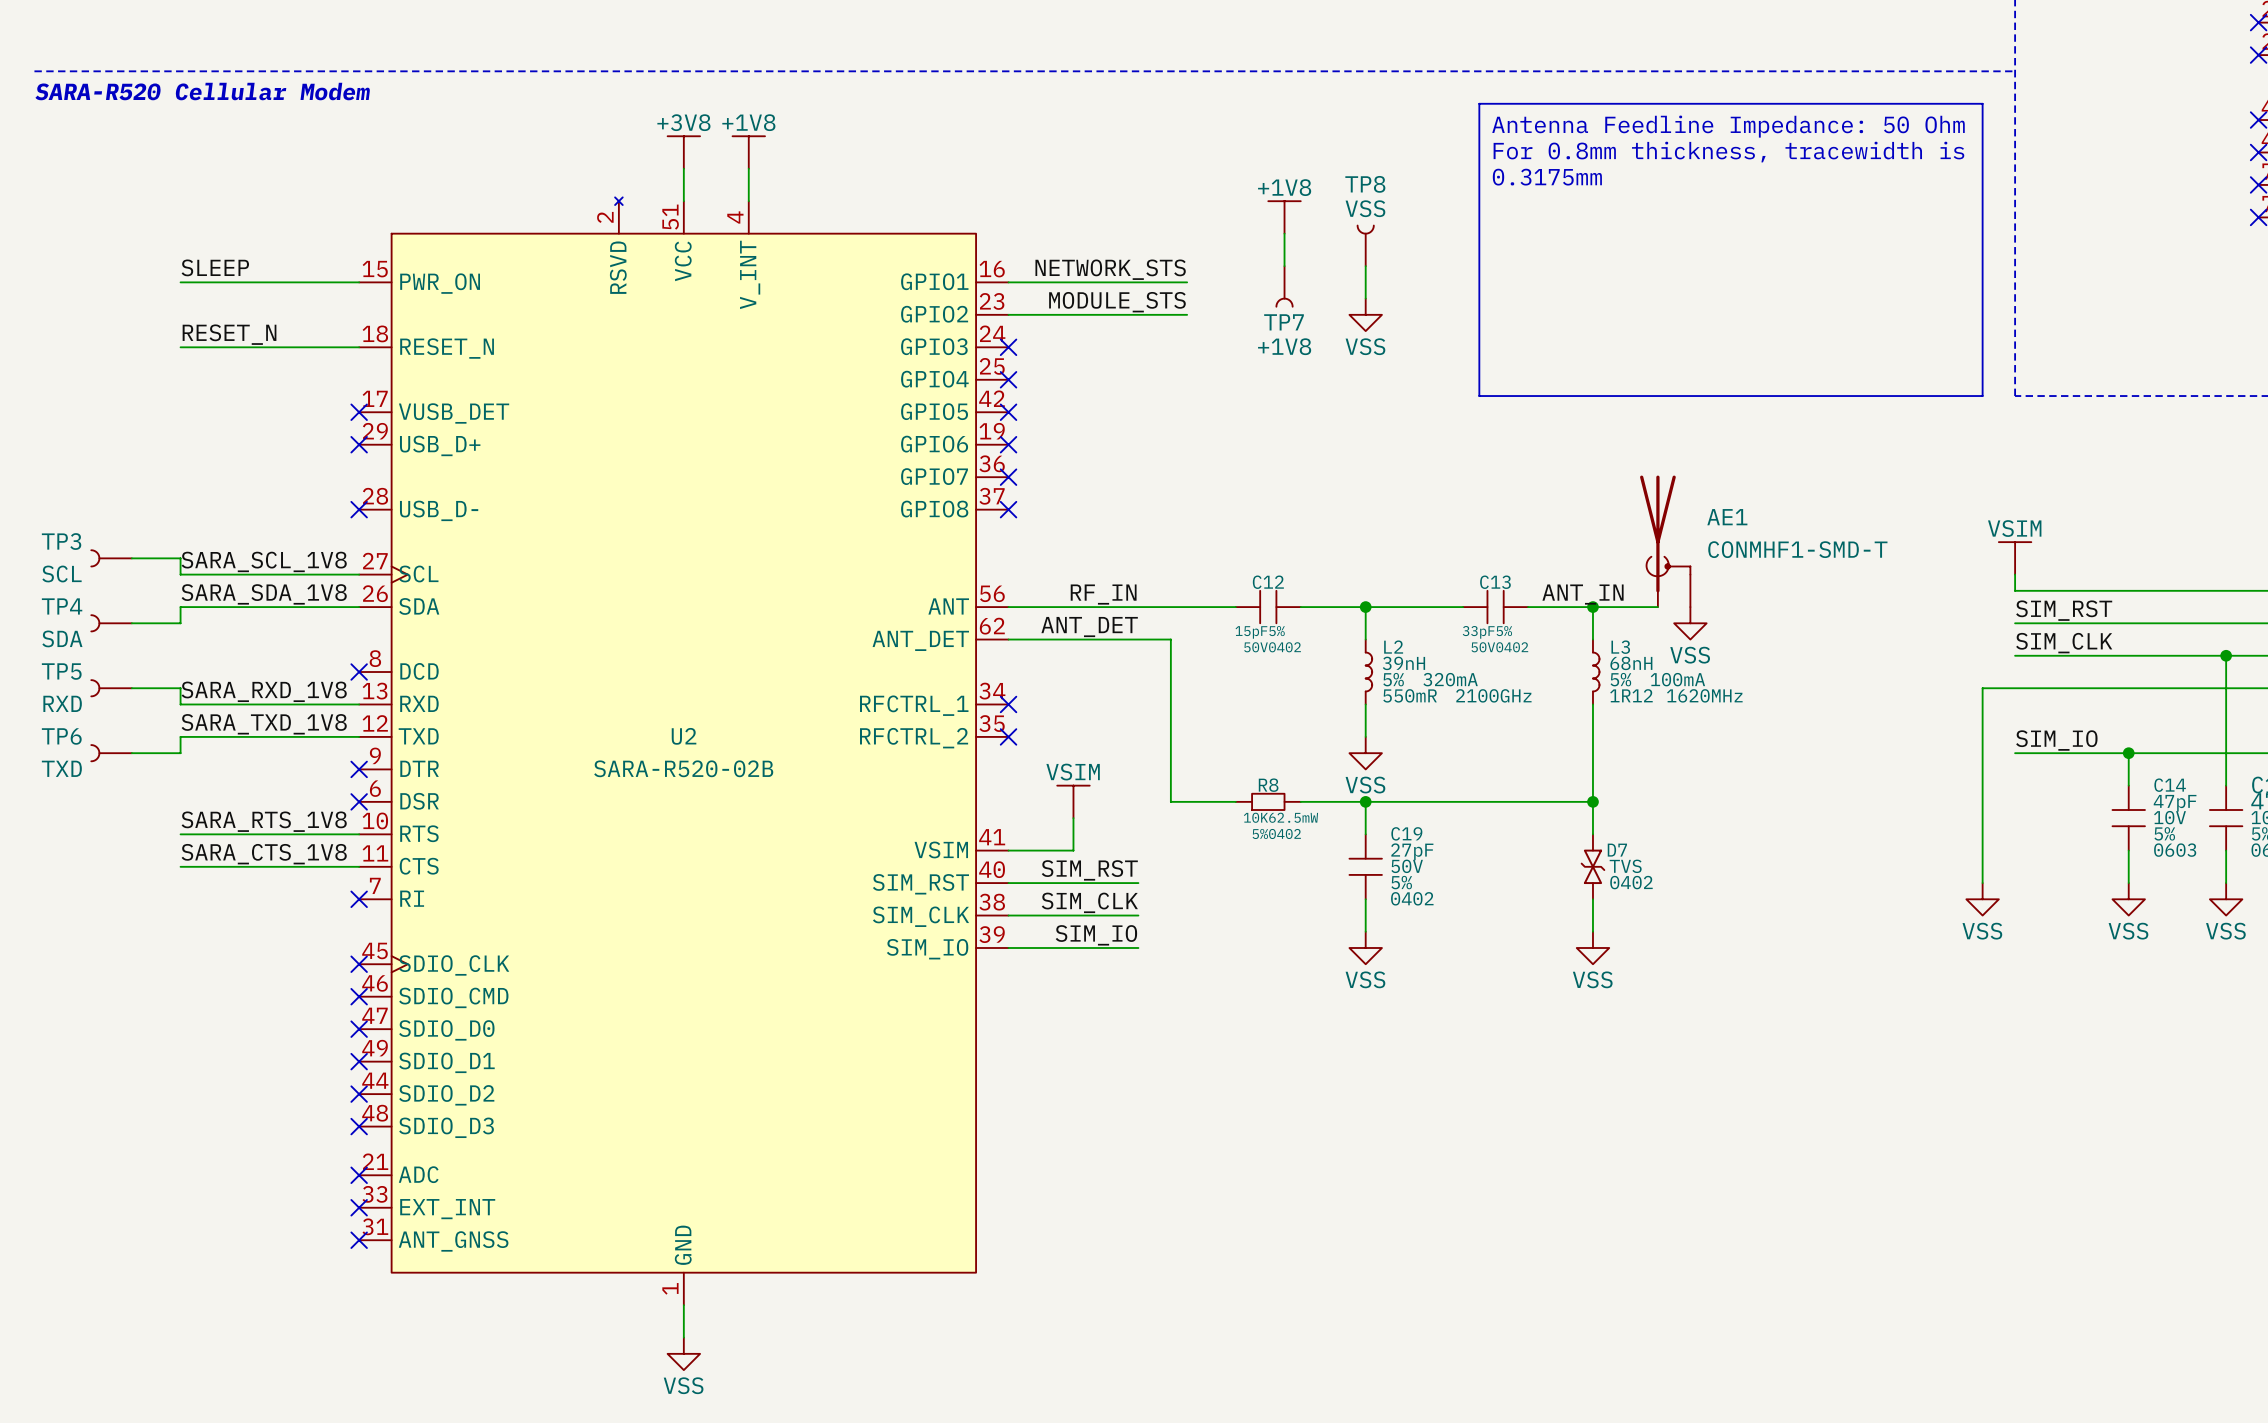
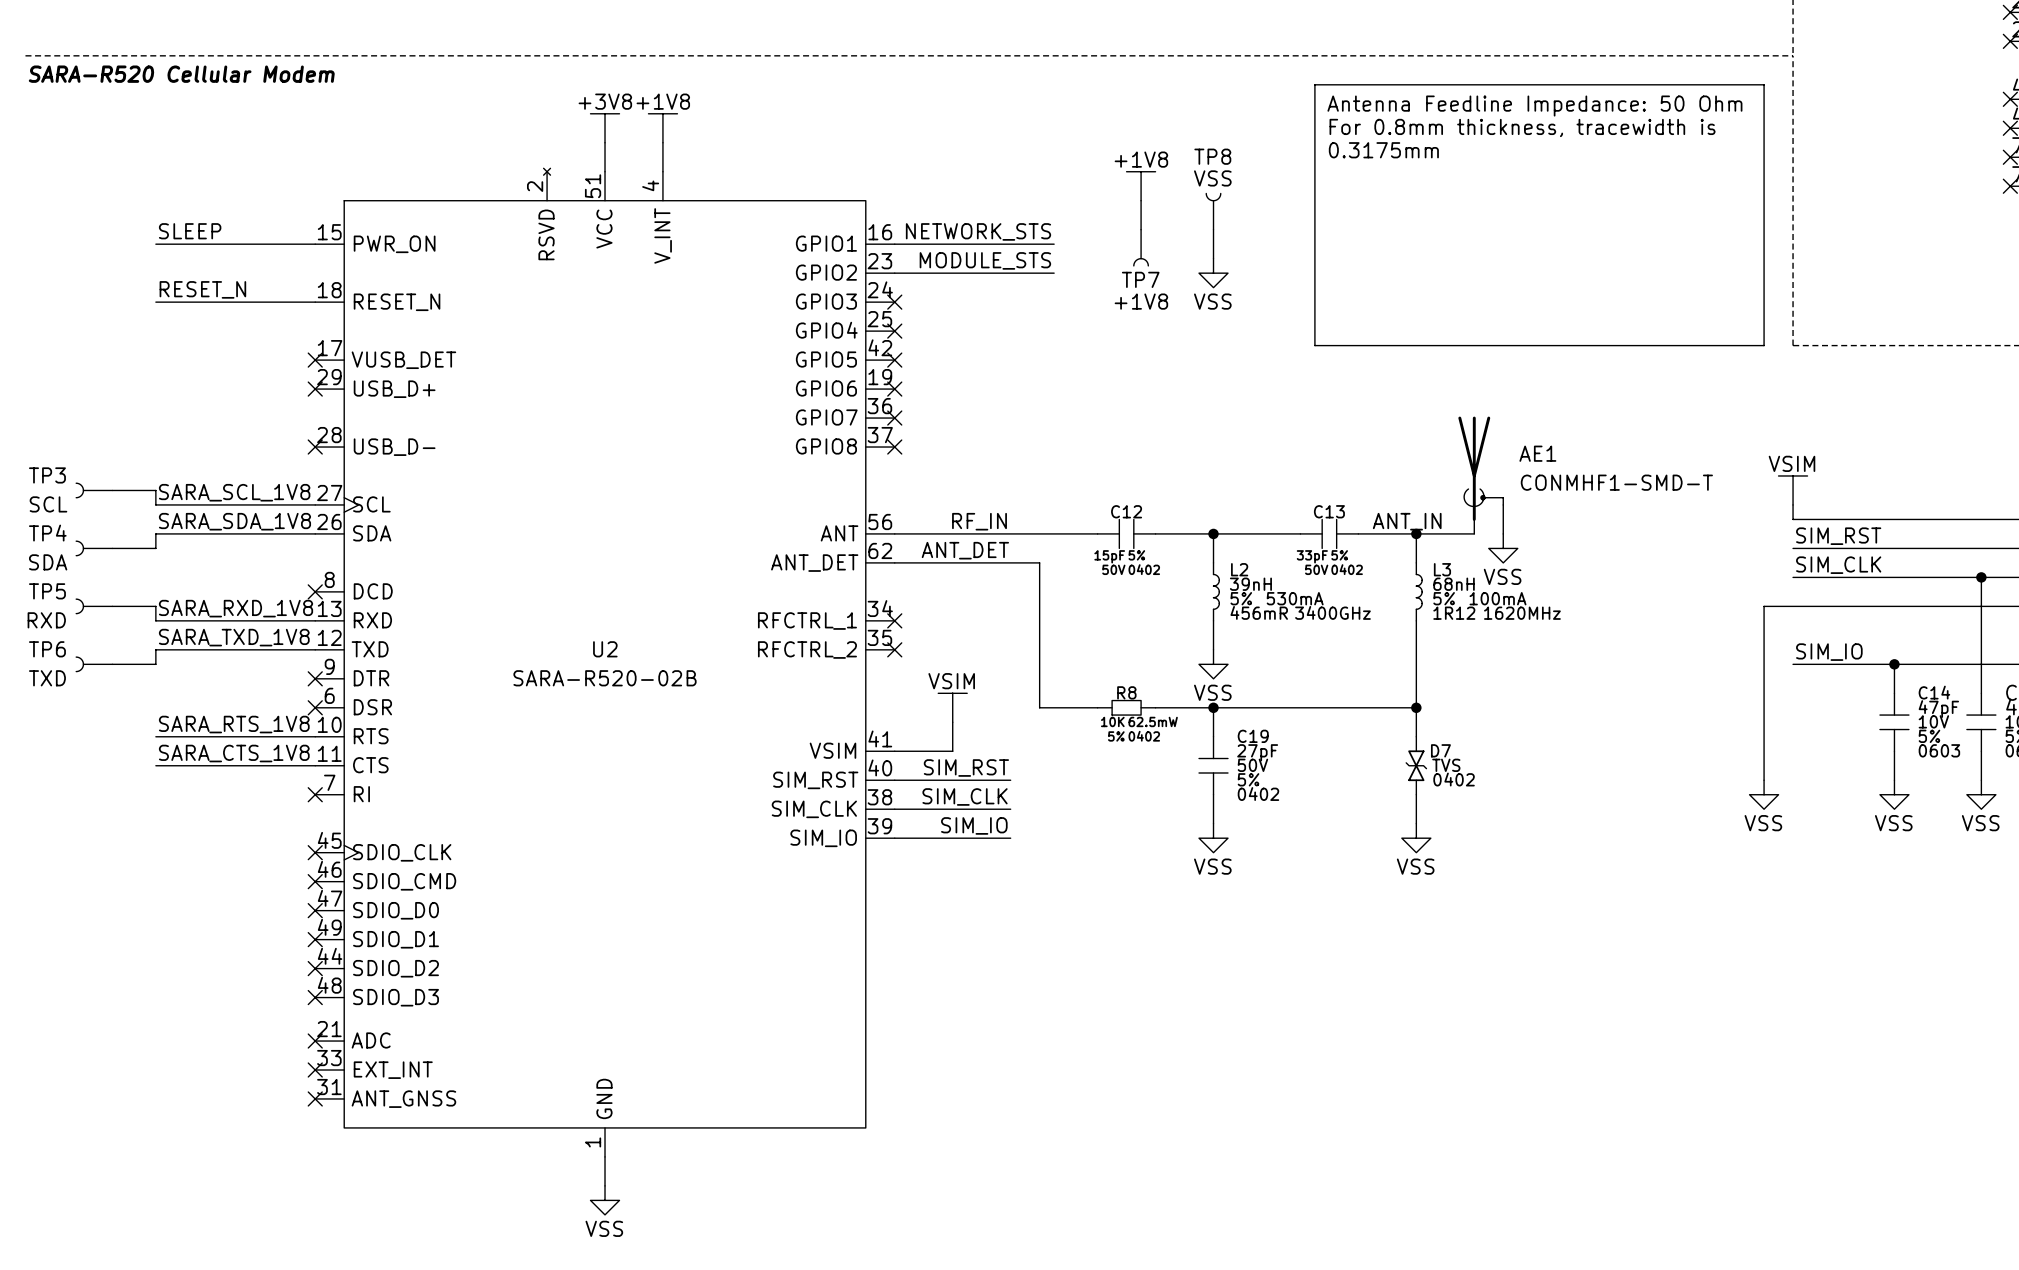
L2 text: 320mA (1450, 679) -> 530mA (1295, 598)
L2 text: 550mR (1410, 695) -> 456mR (1259, 612)
L2 text: 2100GHz (1493, 695) -> 3400GHz (1332, 612)

